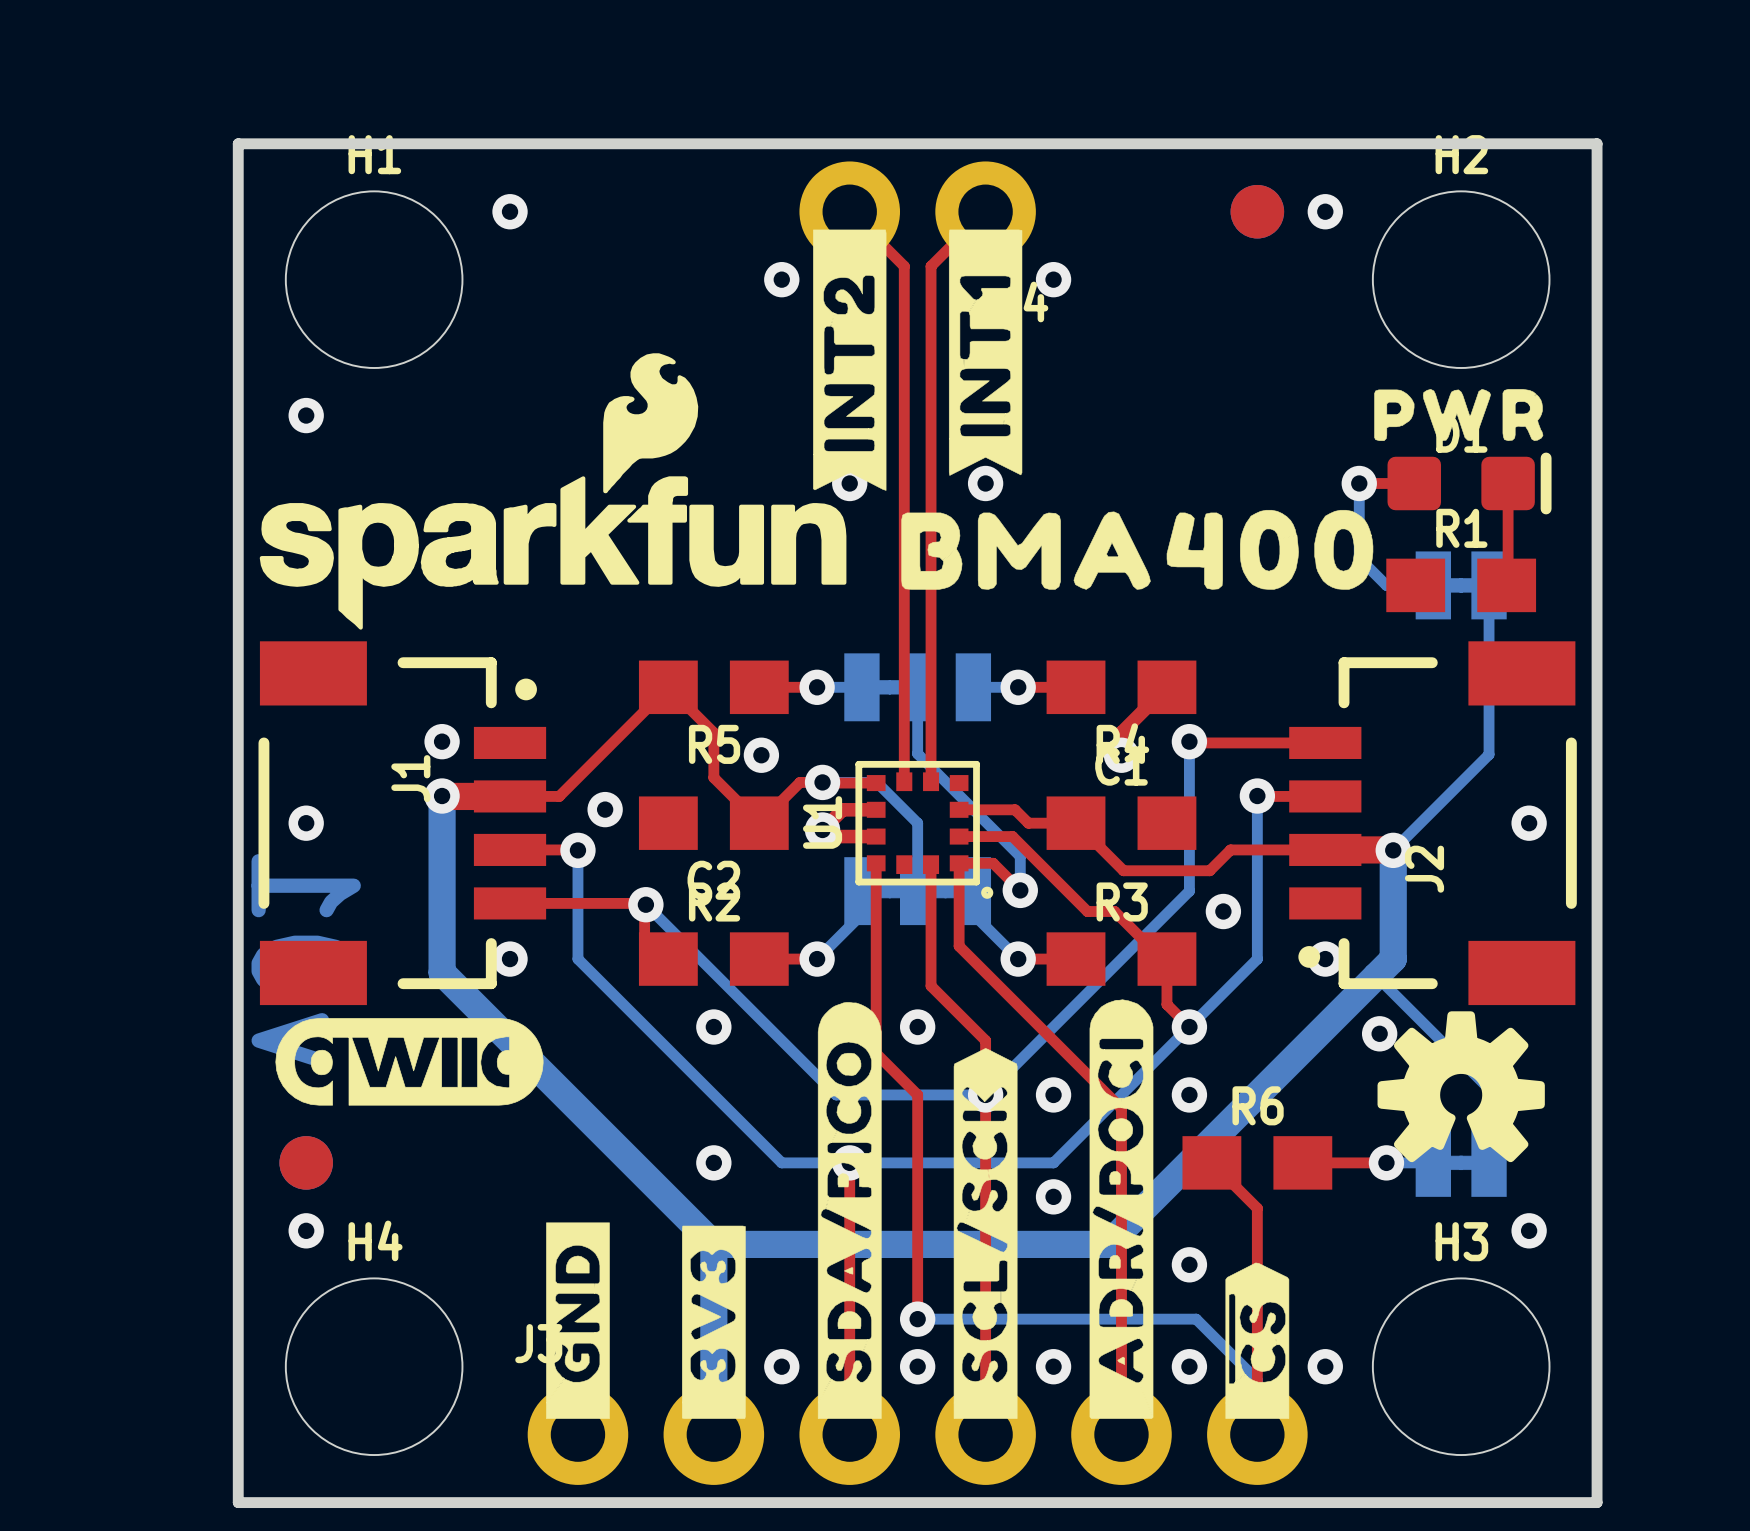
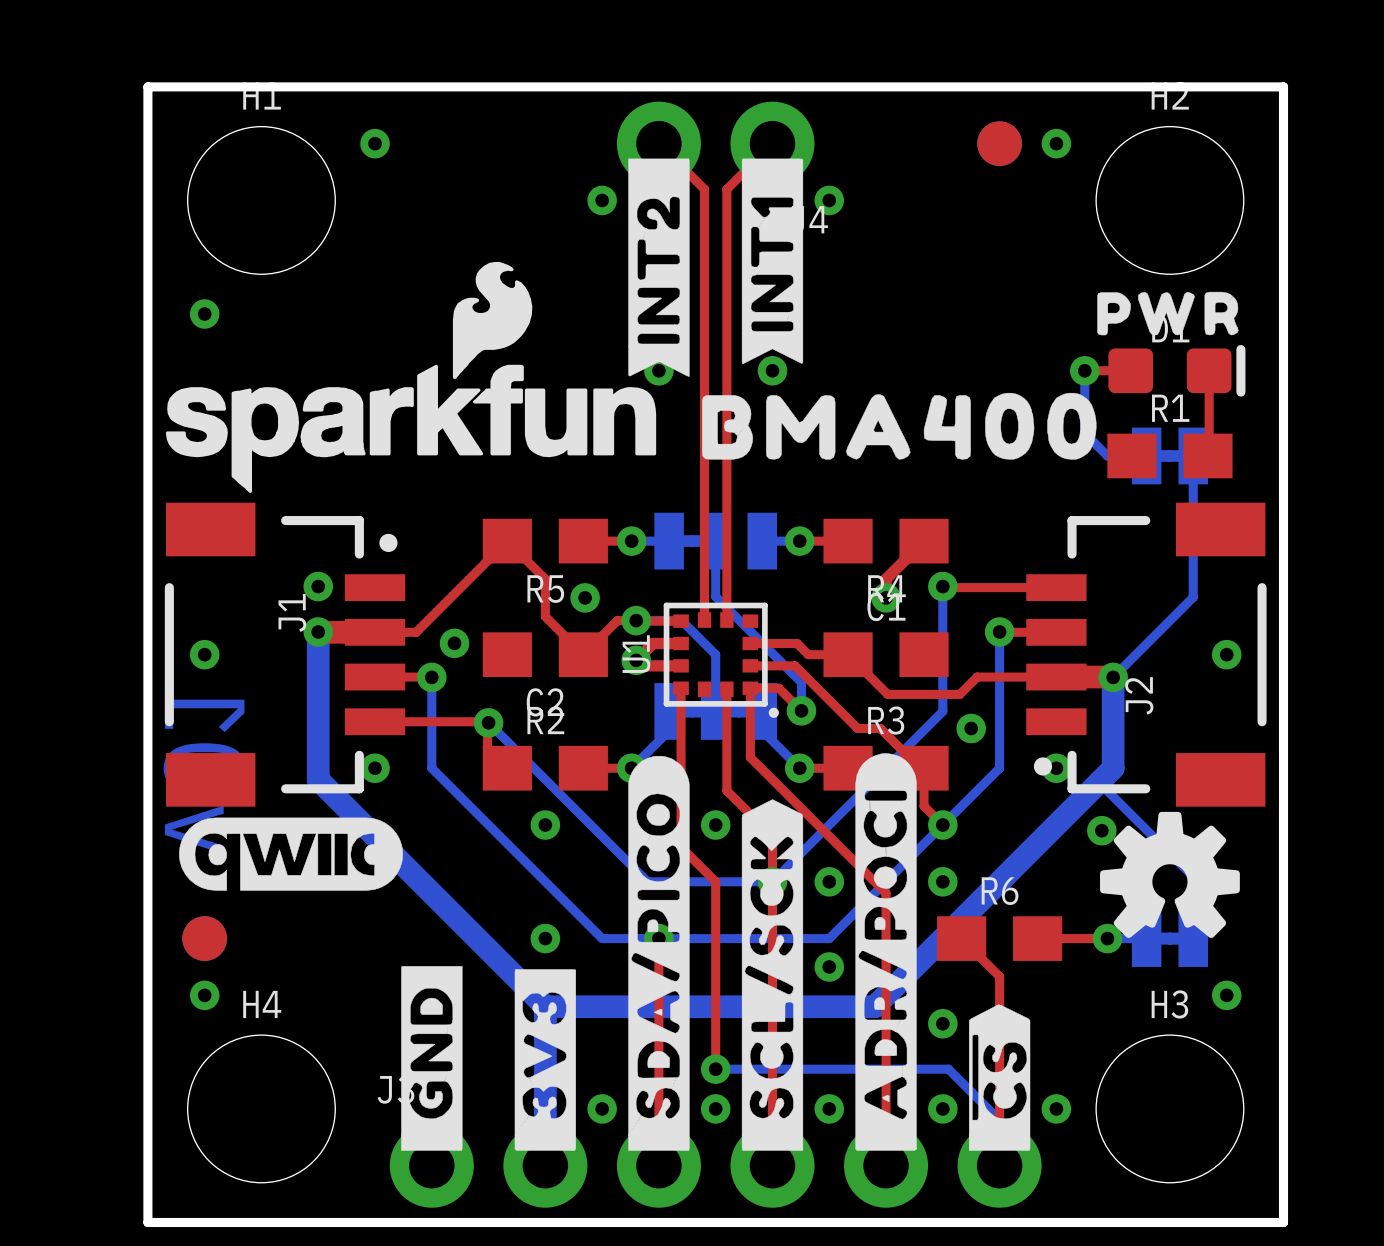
drawing shape: [1089, 999, 1154, 1419] -> [855, 753, 917, 1151]
drawing shape: [817, 1002, 882, 1419] -> [628, 755, 690, 1151]
drawing shape: [953, 1048, 1018, 1419] -> [741, 799, 804, 1151]
drawing shape: [546, 1222, 610, 1419] -> [401, 966, 463, 1151]
drawing shape: [682, 1225, 746, 1419] -> [514, 969, 576, 1151]
drawing shape: [1225, 1262, 1290, 1419] -> [968, 1004, 1031, 1151]

